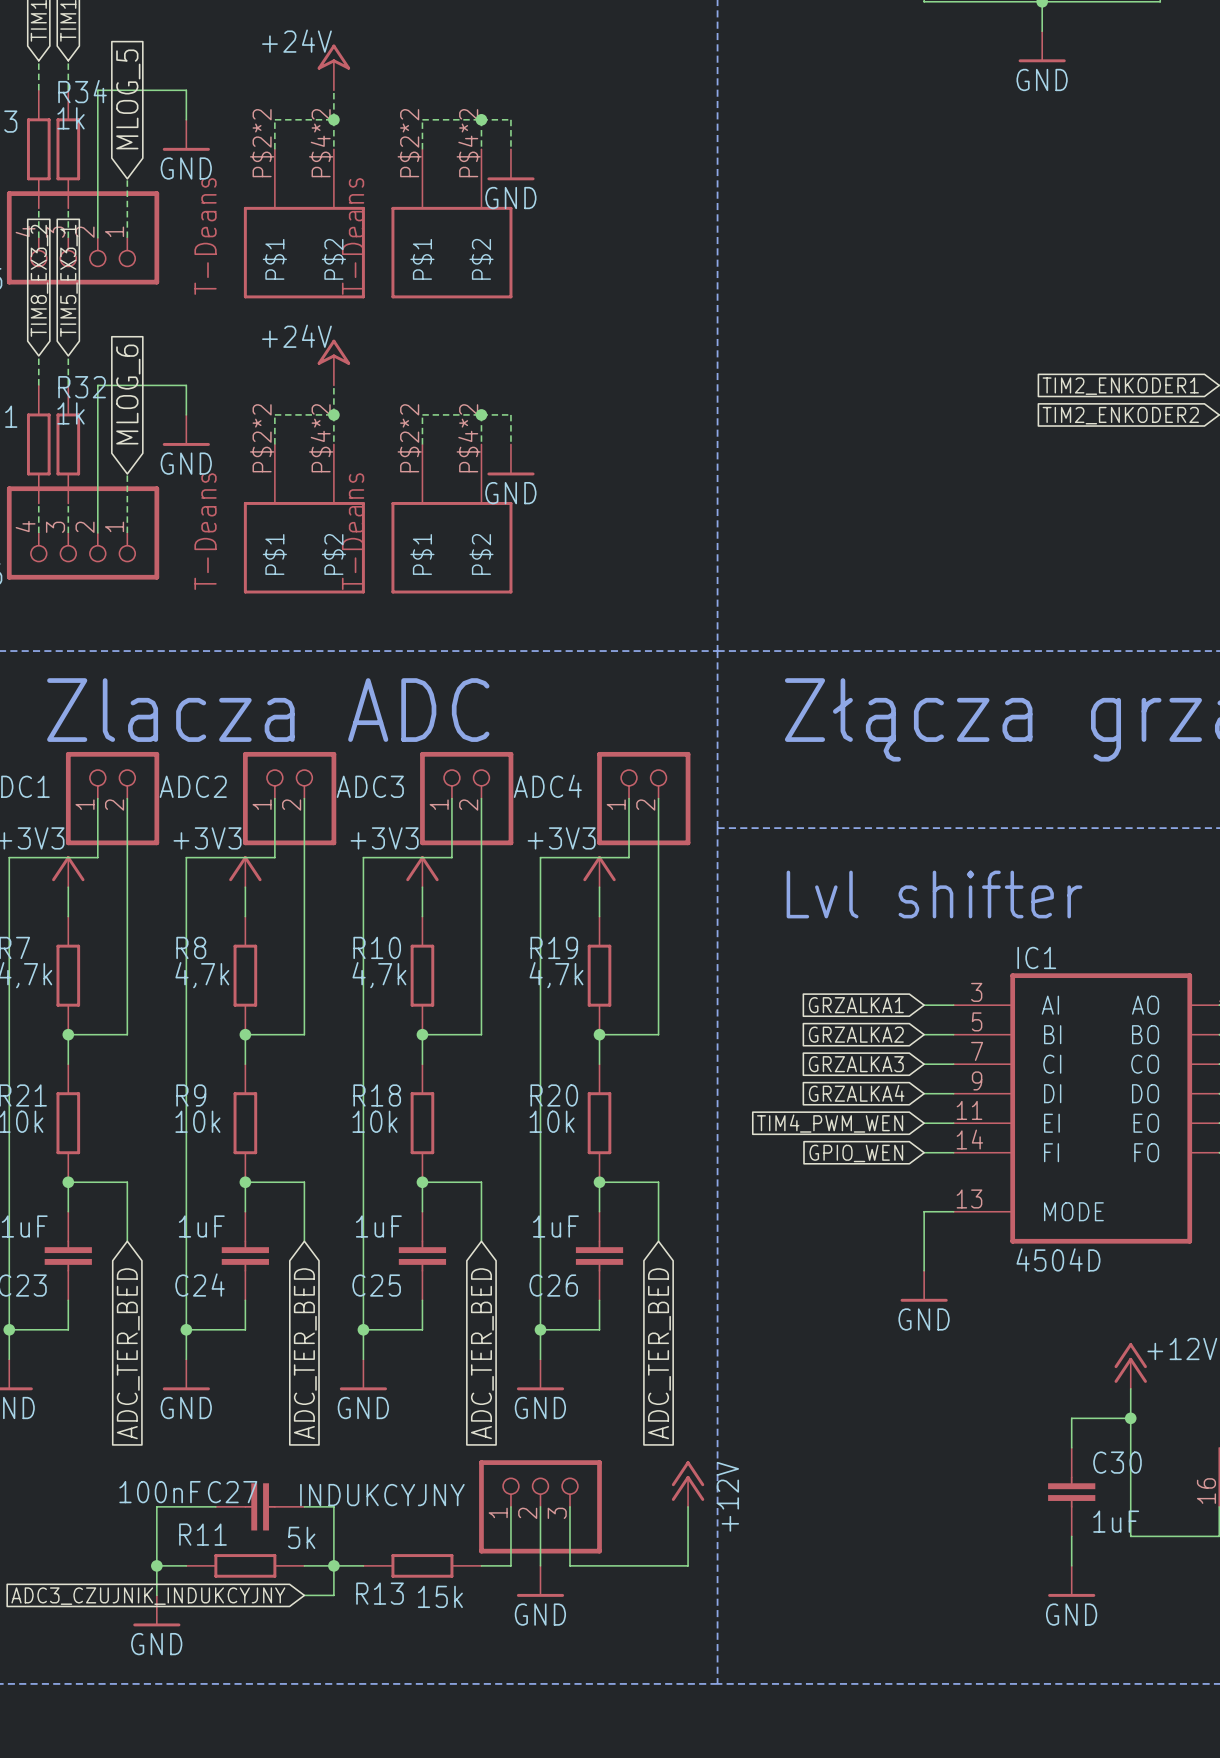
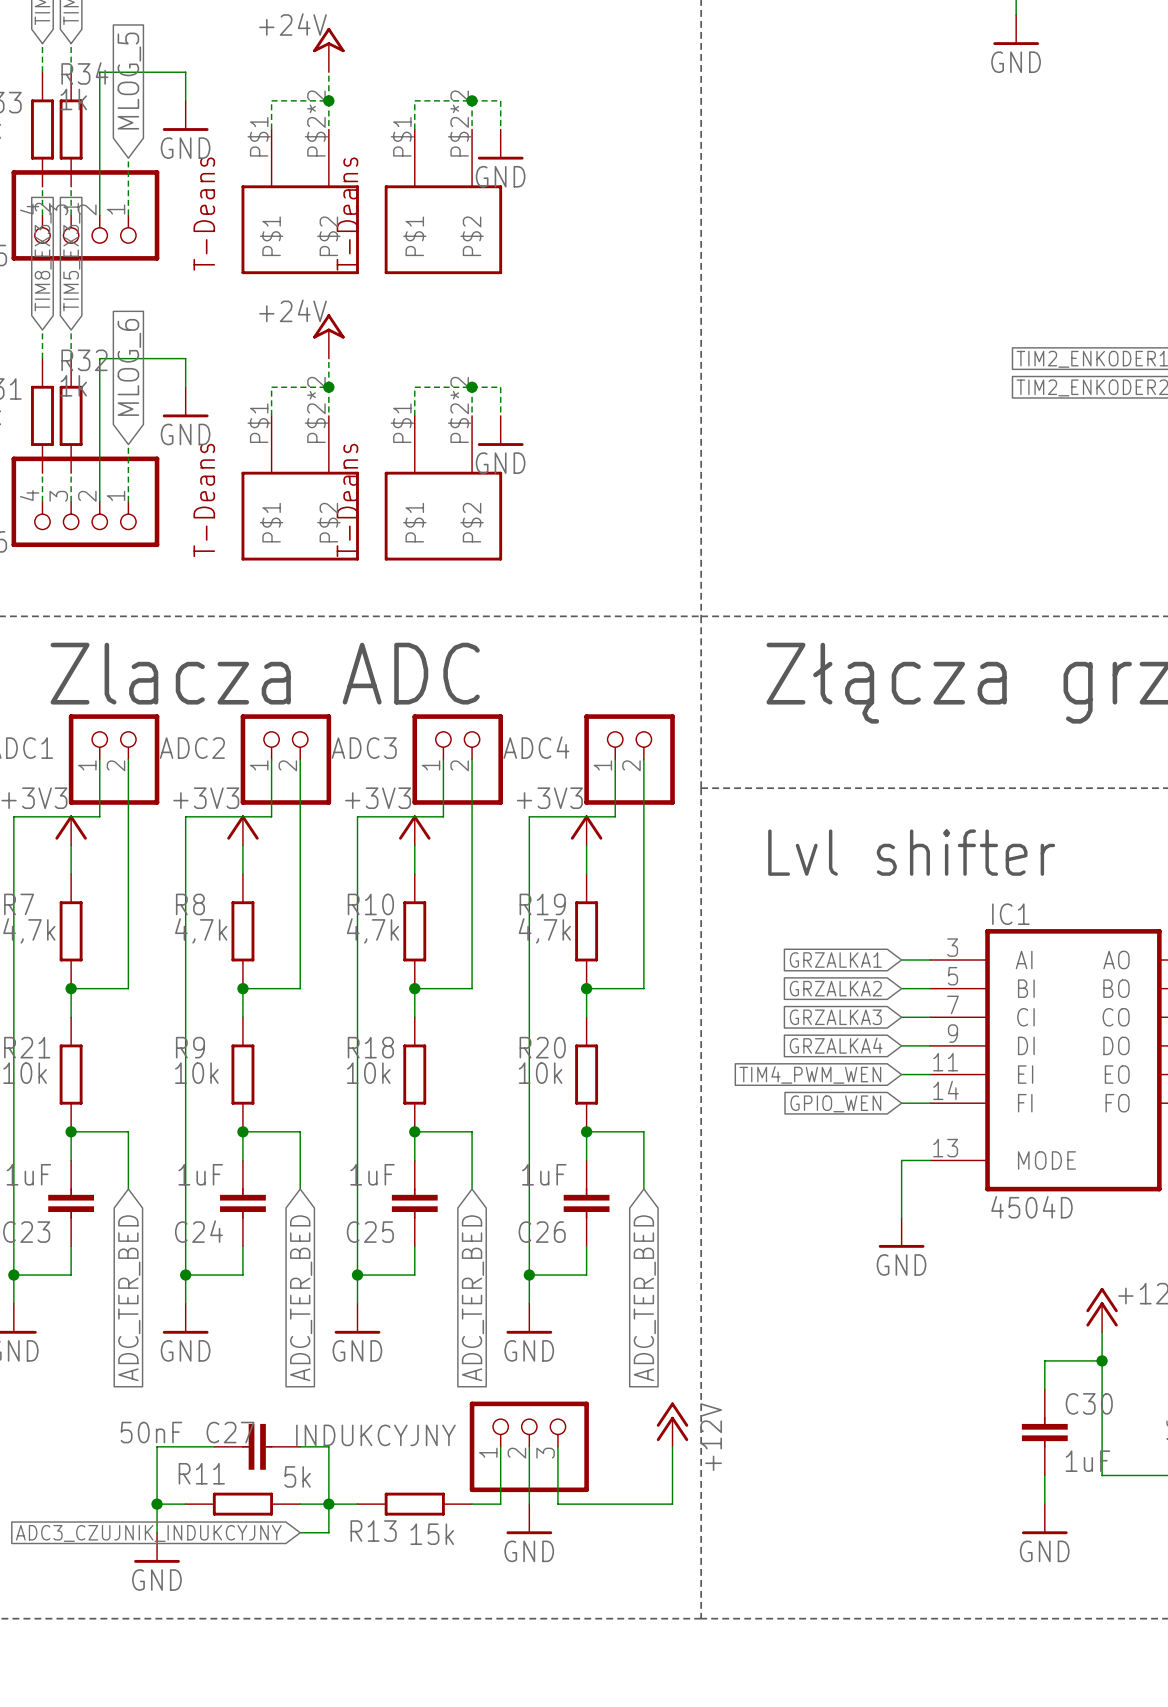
part pin number: P$2*2 (262, 143) -> P$1 (259, 136)
part pin number: P$4*2 (321, 143) -> P$2*2 (316, 123)
part pin number: P$2*2 (409, 143) -> P$1 (402, 136)
part pin number: P$4*2 (468, 143) -> P$2*2 (459, 123)
part pin number: P$2*2 (262, 438) -> P$1 (259, 423)
part pin number: P$4*2 (321, 438) -> P$2*2 (316, 409)
part pin number: P$2*2 (409, 438) -> P$1 (402, 423)
part pin number: P$4*2 (468, 438) -> P$2*2 (459, 409)
C27 value: 100nF (159, 1492) -> 50nF (151, 1432)

